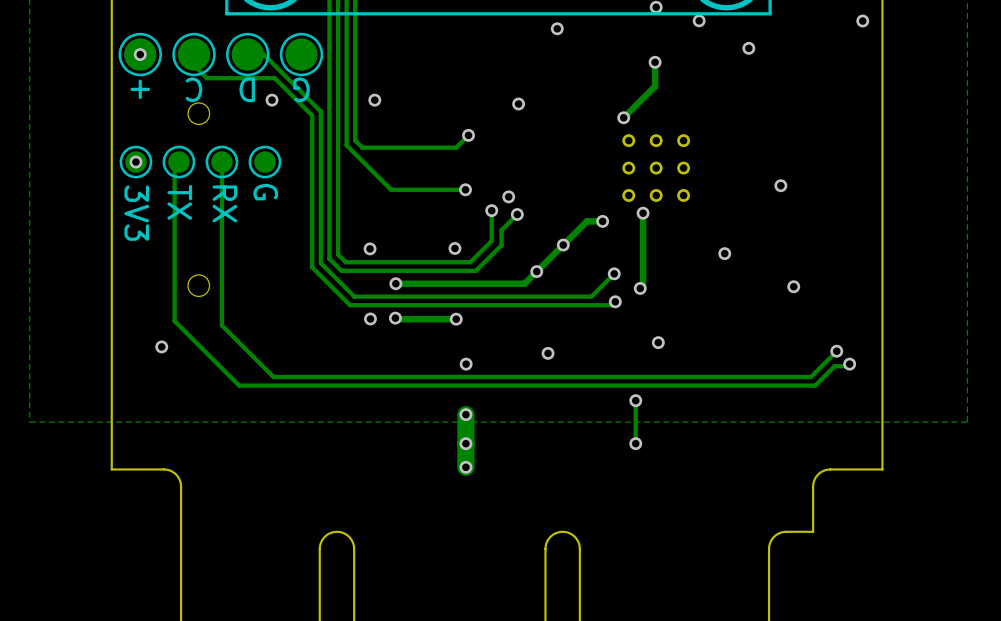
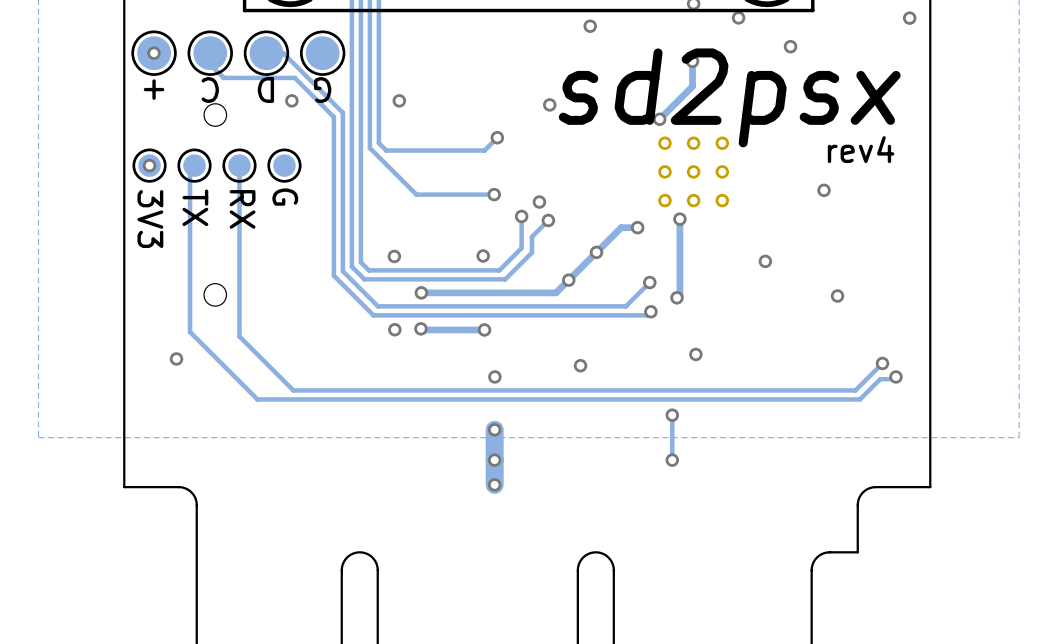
text: none -> sd2psx (729, 97)
text: none -> rev4 (861, 149)

